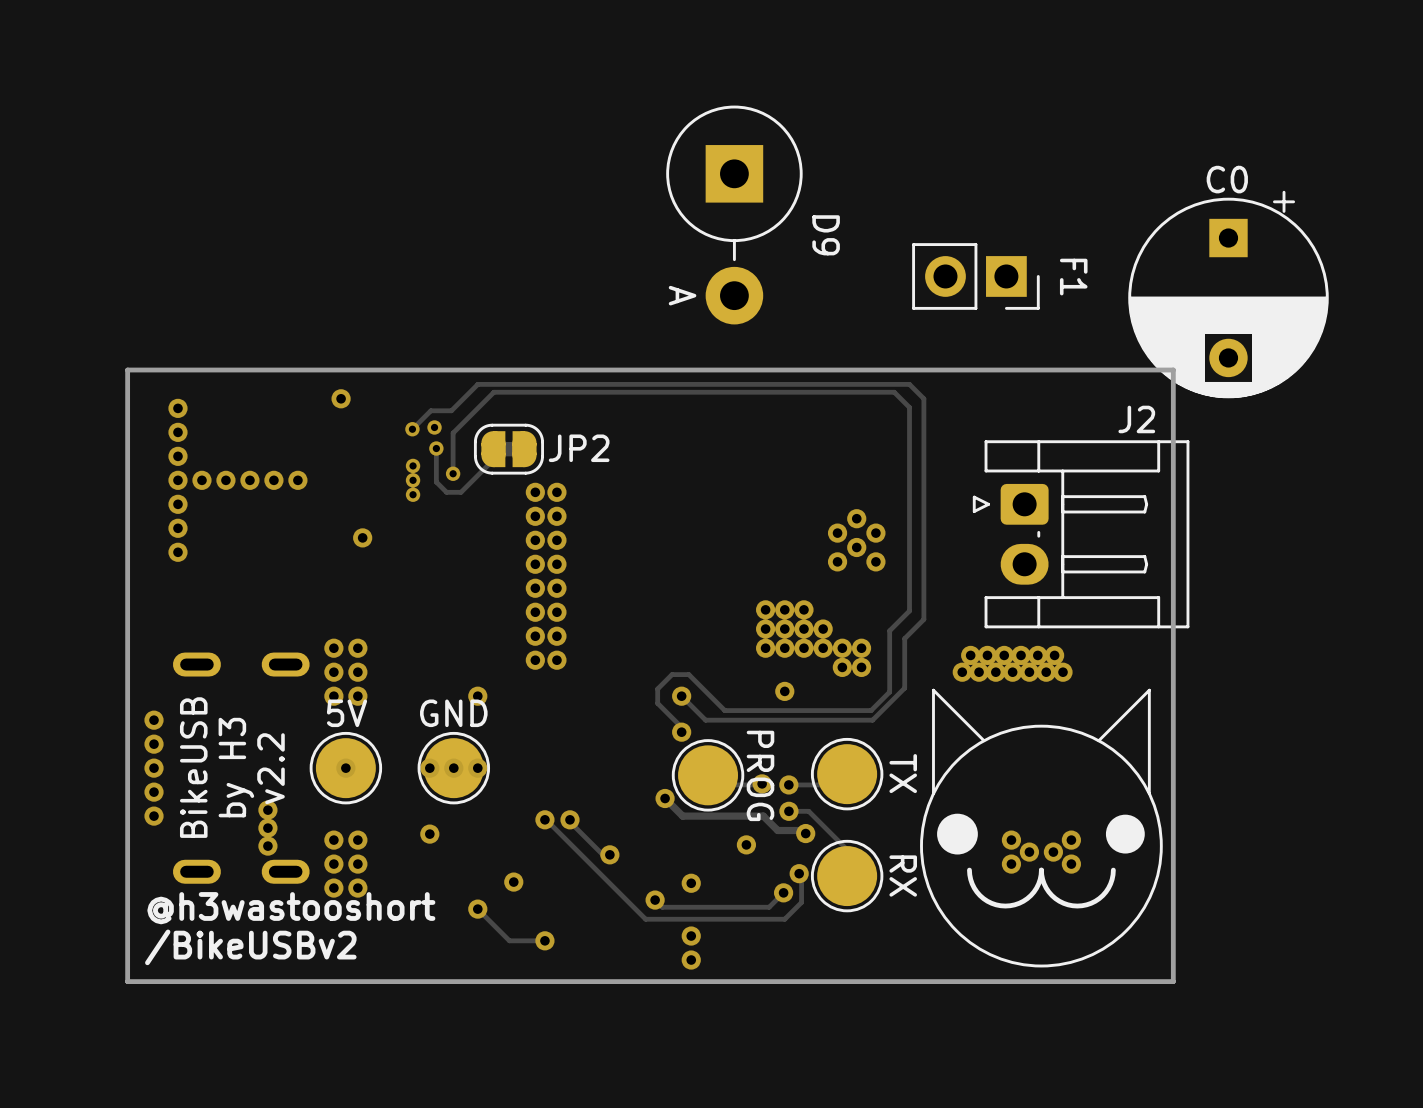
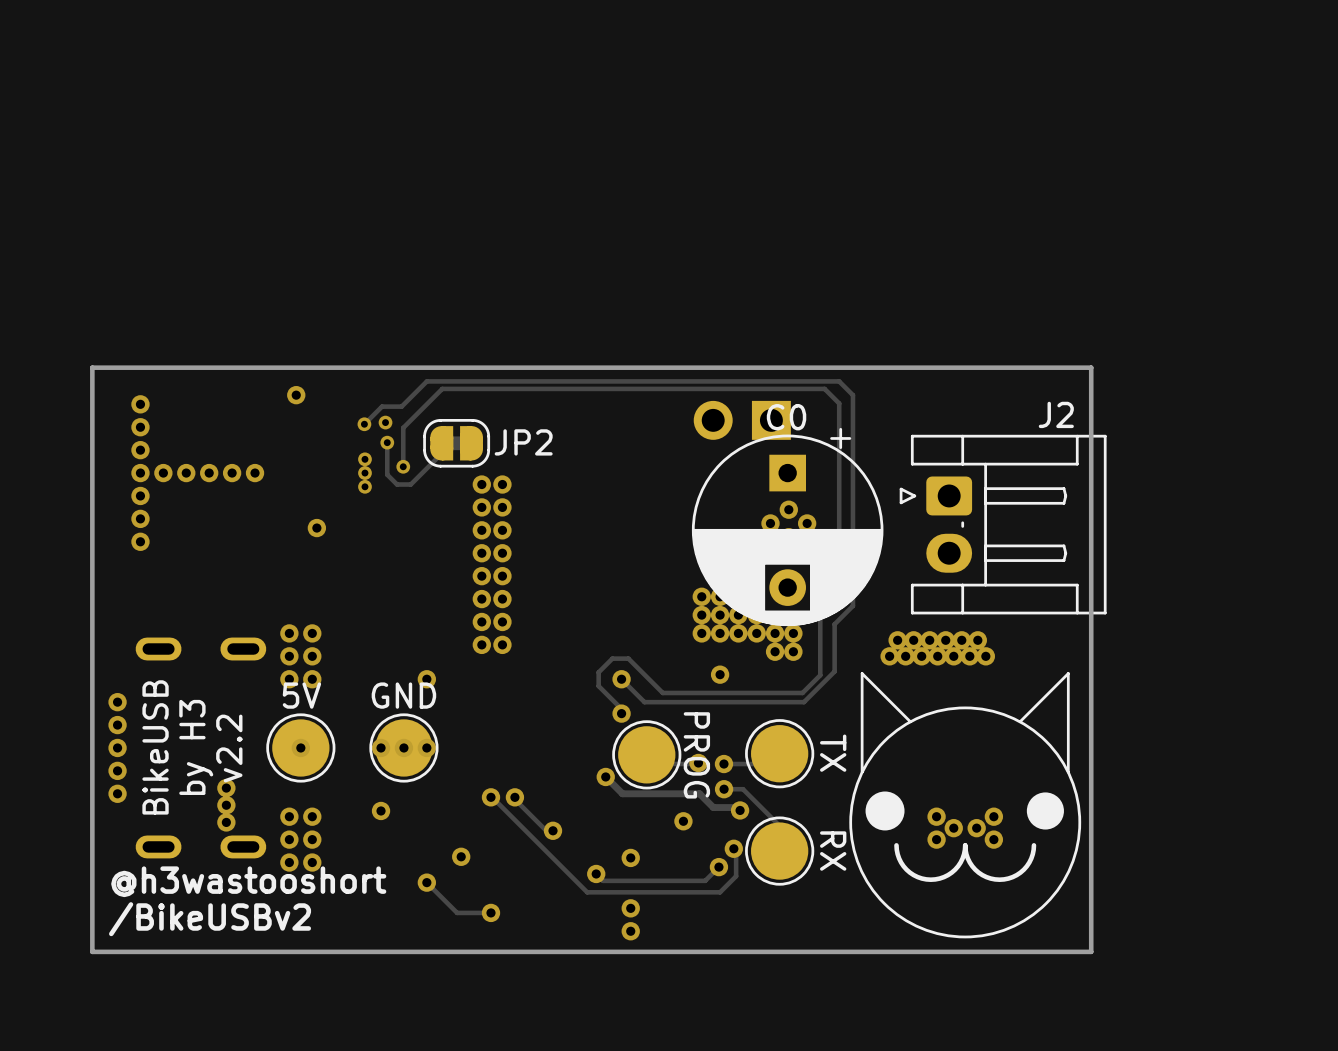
D9: (734, 215) -> none
F1 side: bottom (975, 276) -> top (742, 420)
C0 position: (1228, 294) -> (787, 527)

